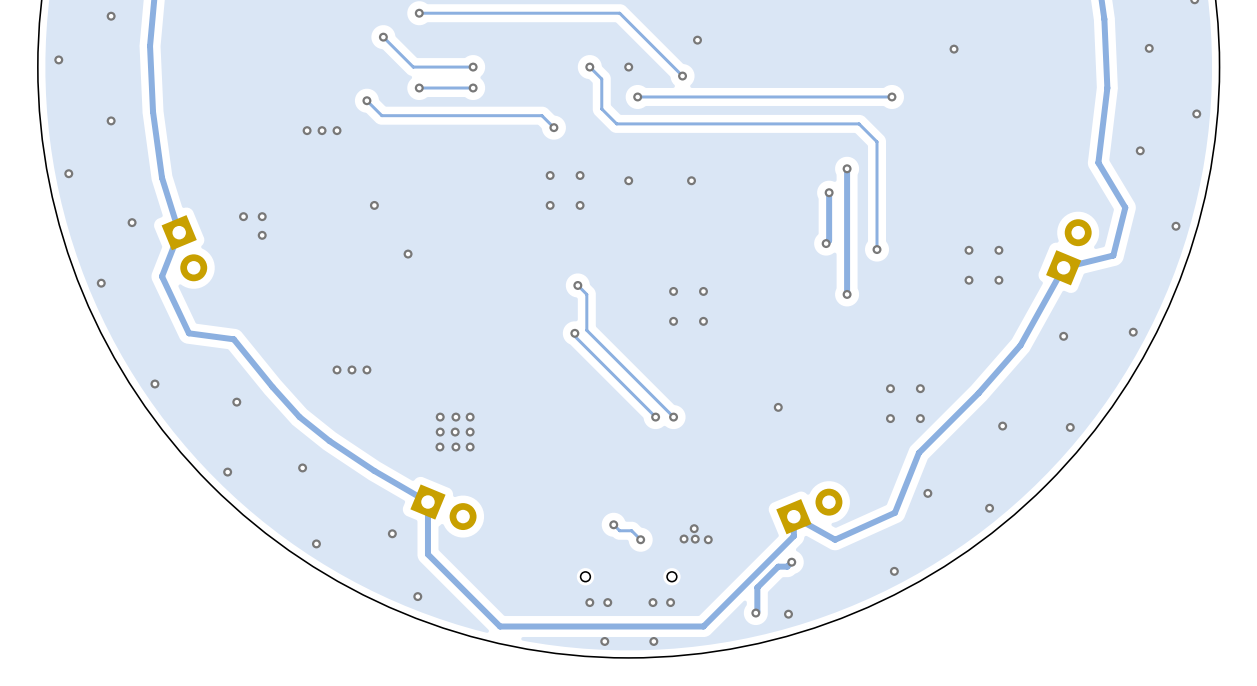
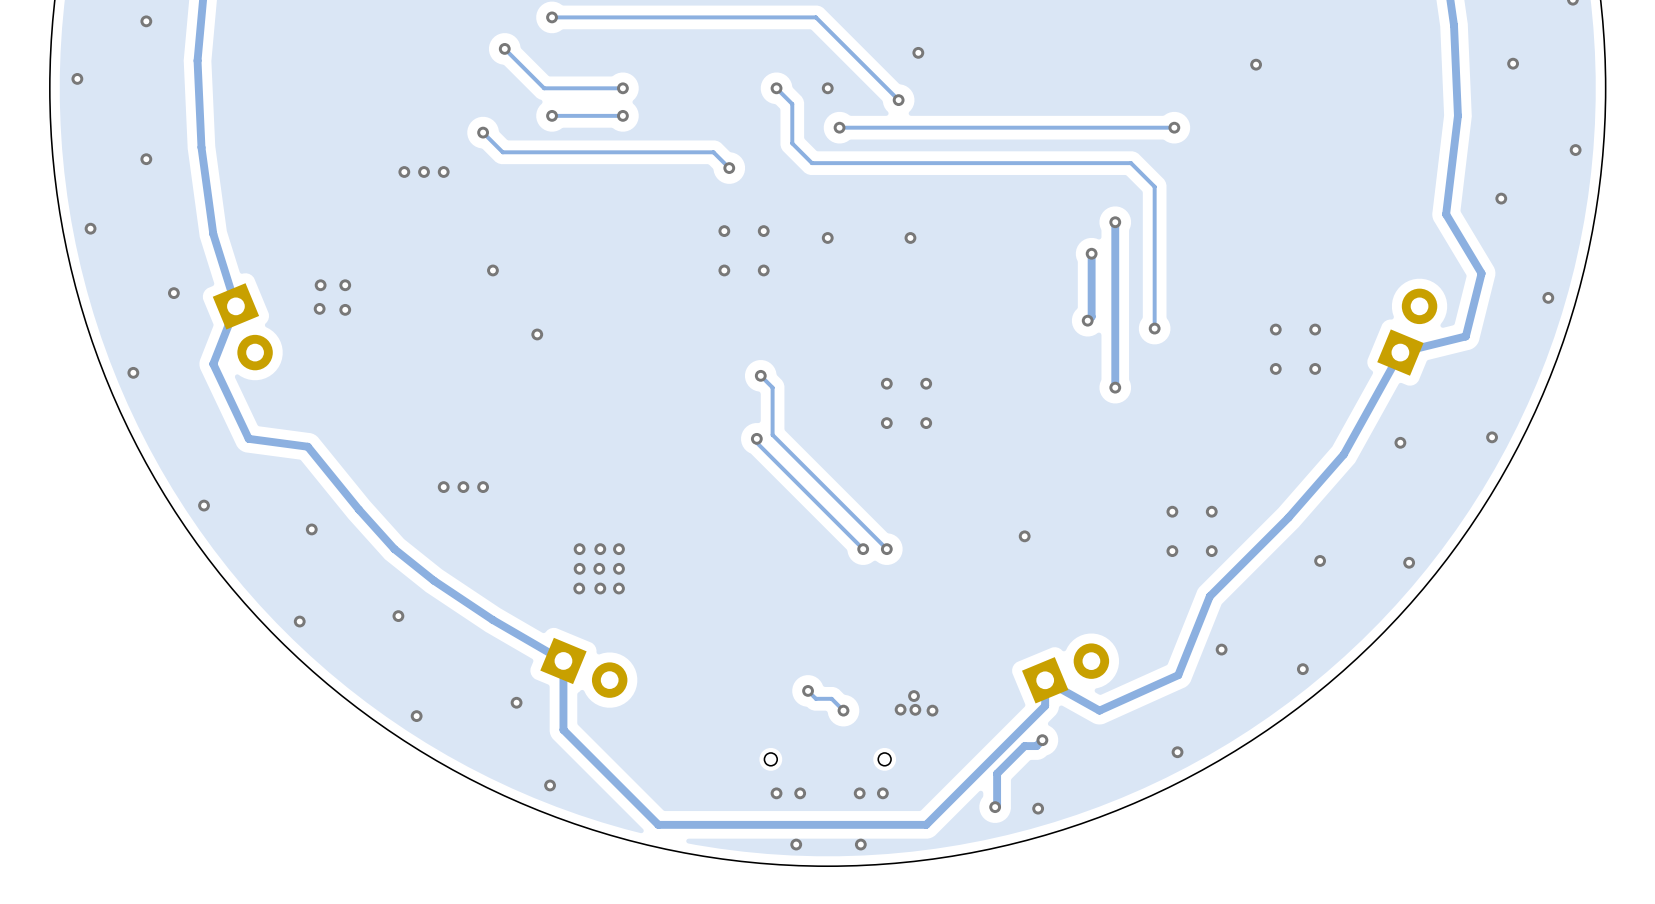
via: none -> (319, 308)

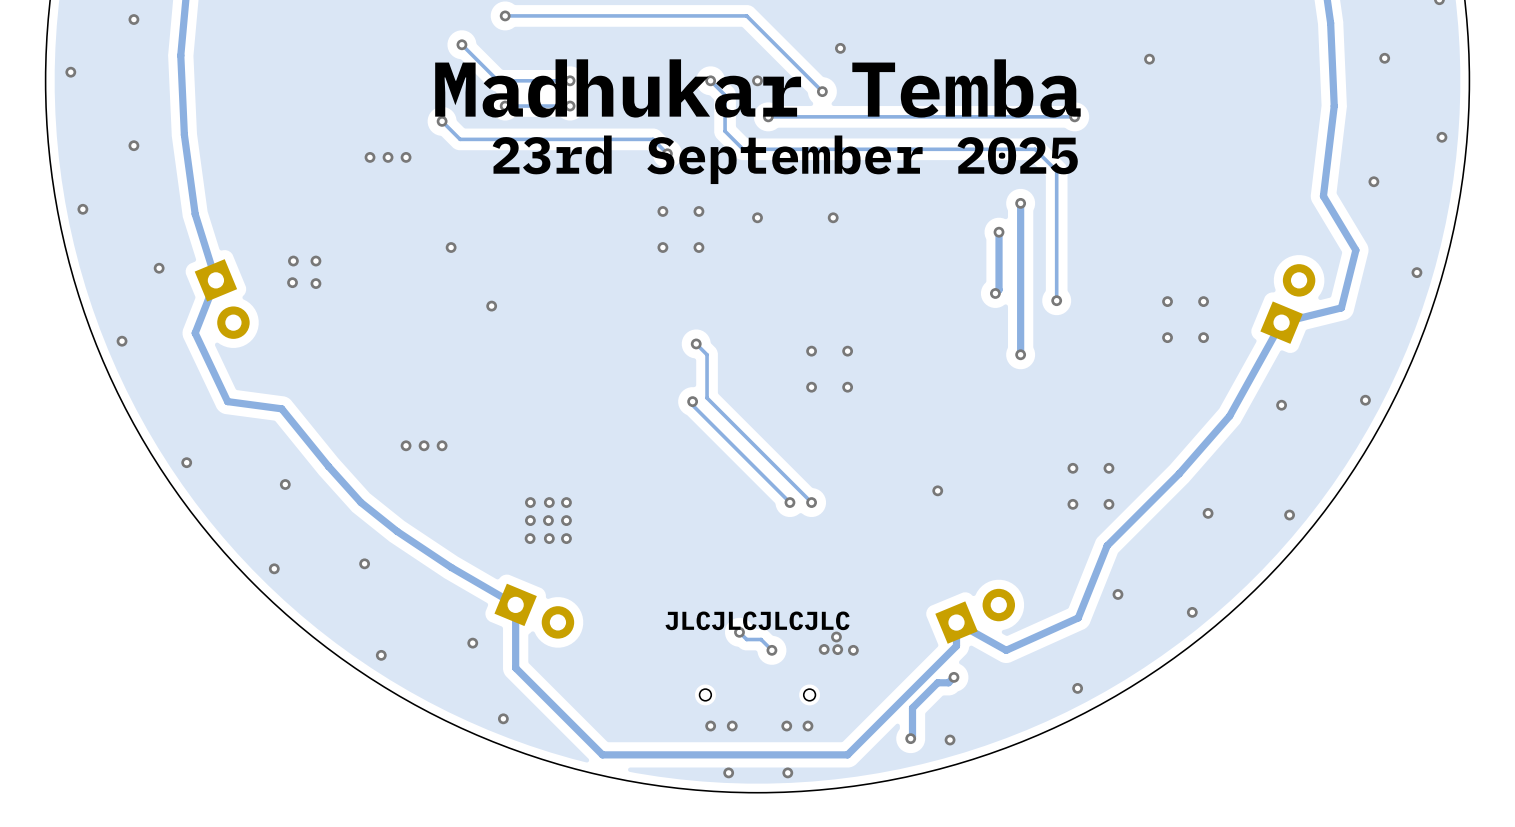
text: none -> Madhukar Temba (757, 88)
text: none -> 23rd September 2025 (785, 159)
text: none -> JLCJLCJLCJLC (757, 620)

